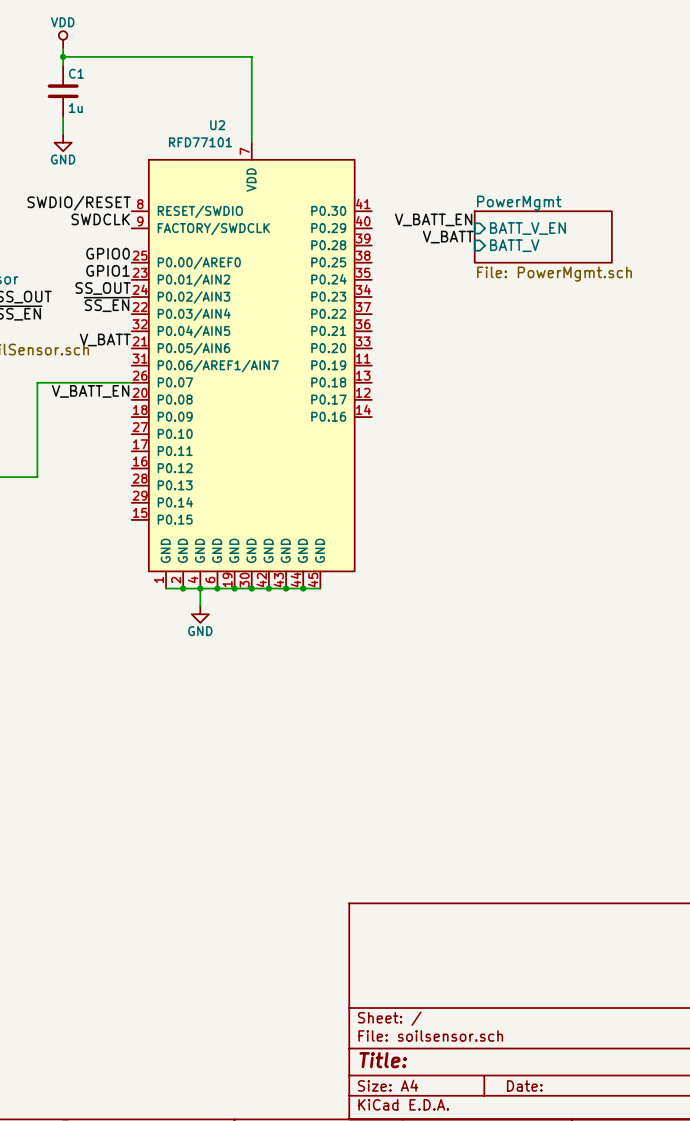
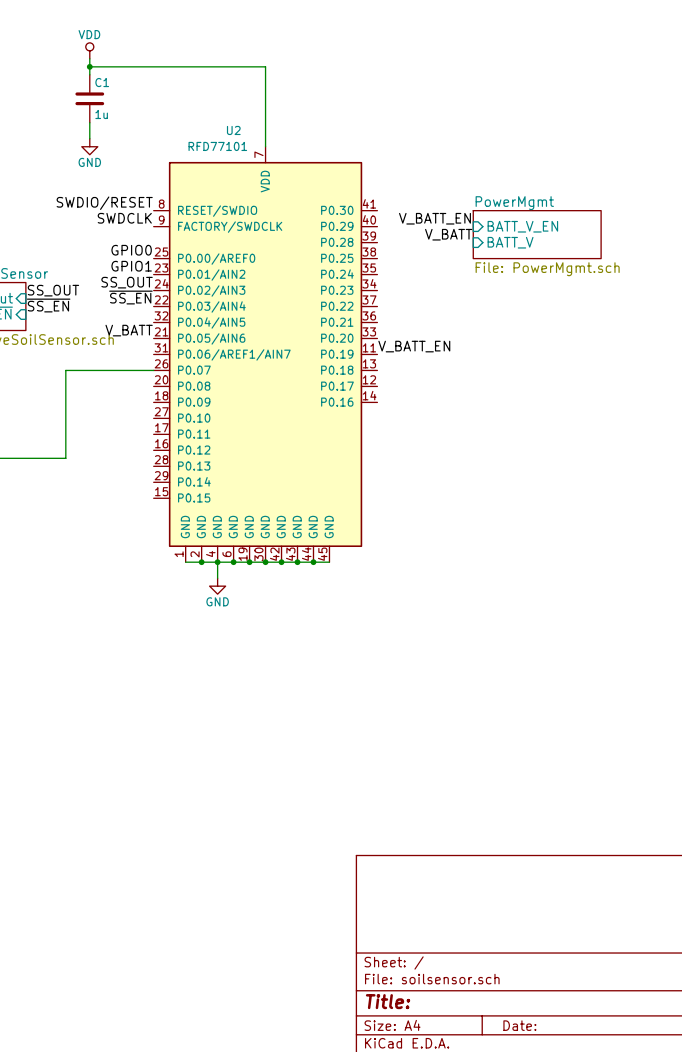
label: none -> V_BATT_EN (414, 346)
label: V_BATT_EN (90, 391) -> none

